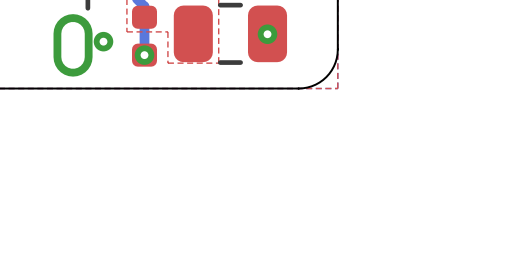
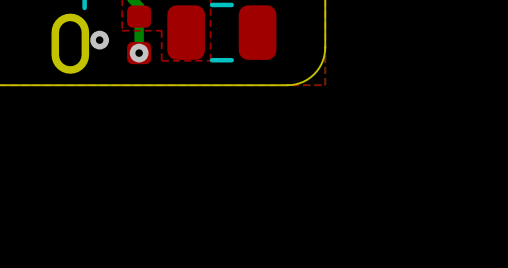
via: (267, 34) -> none

